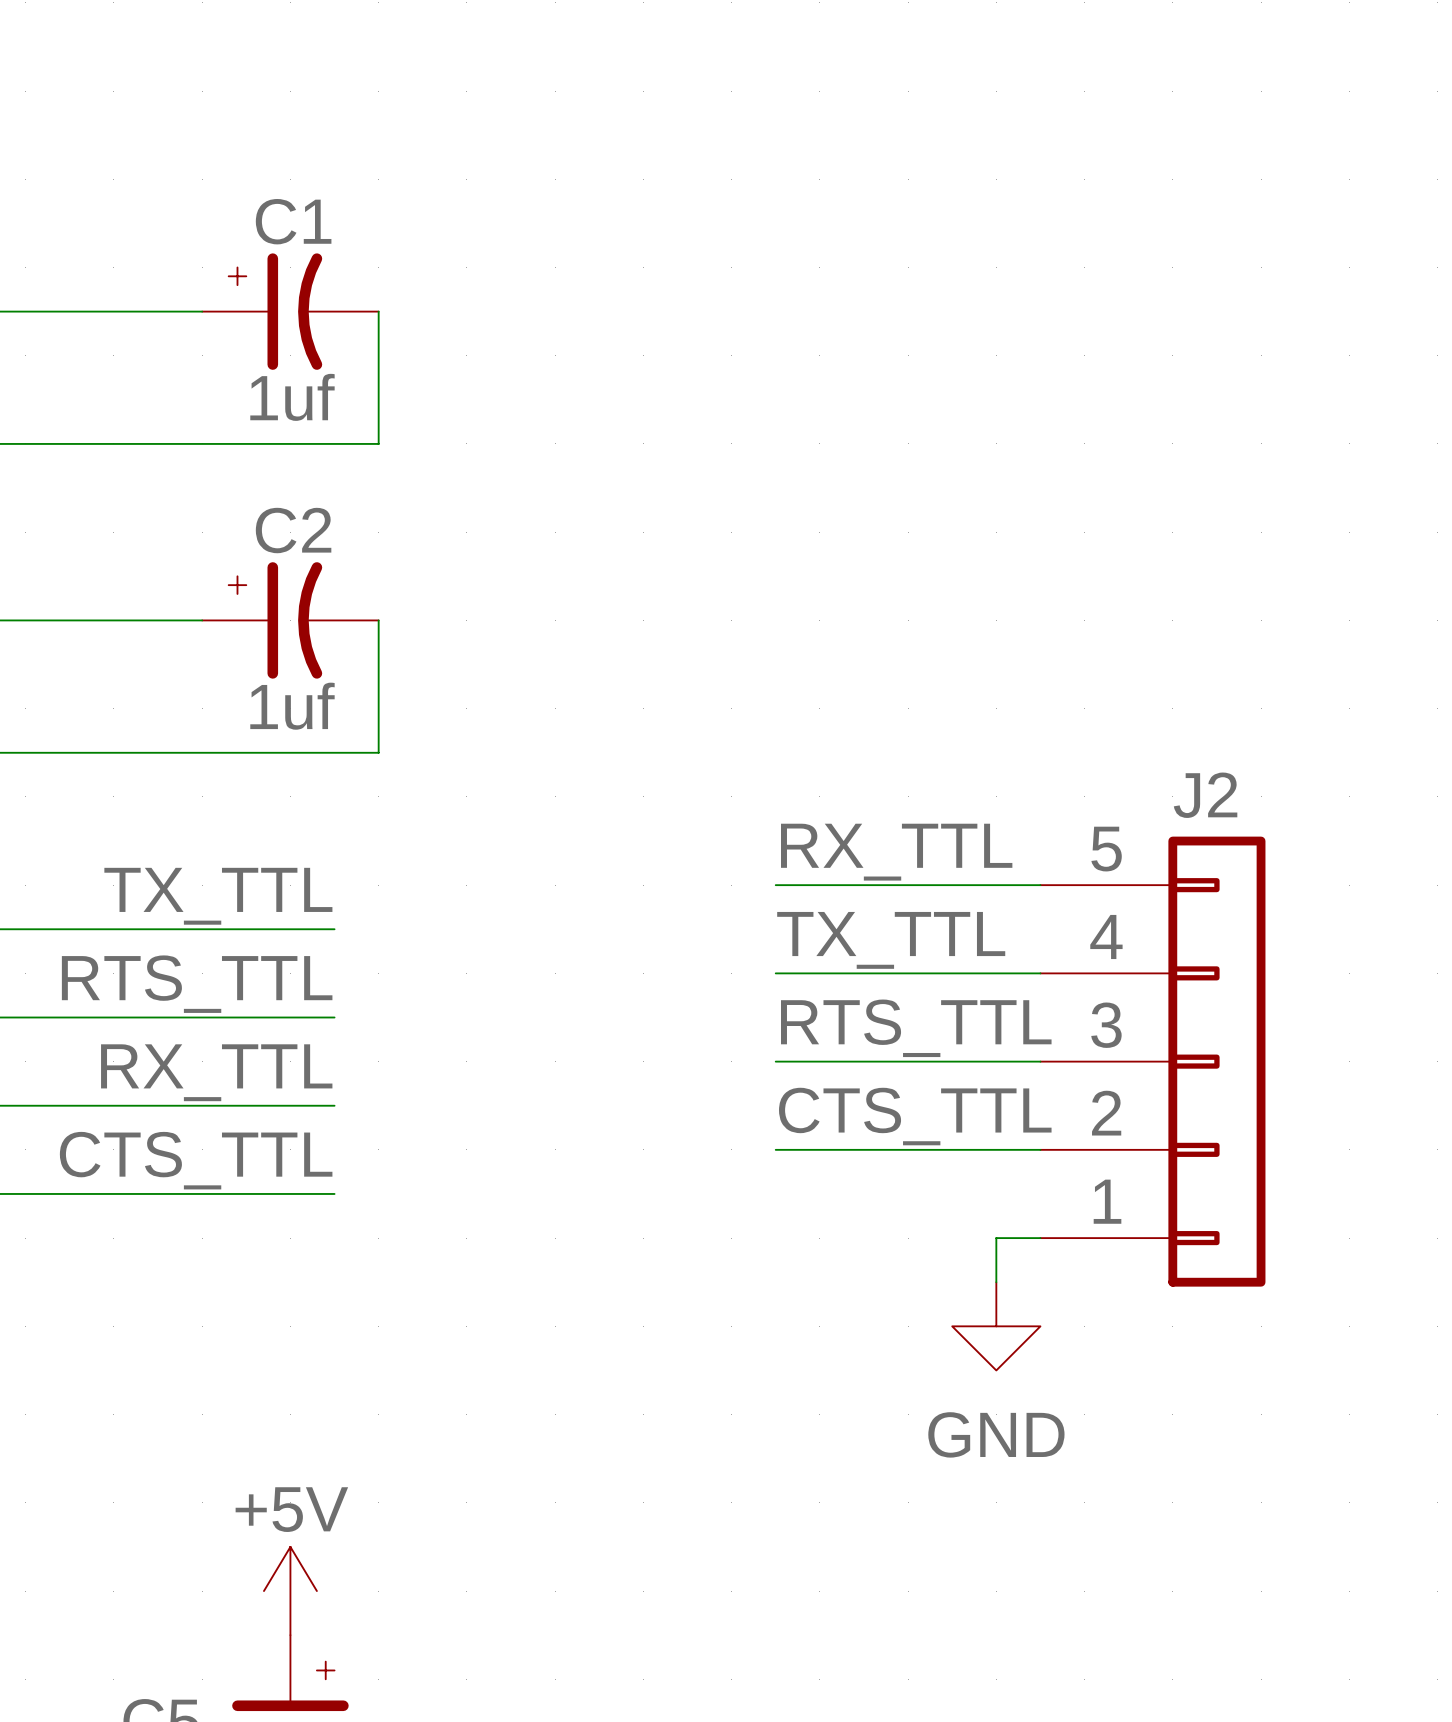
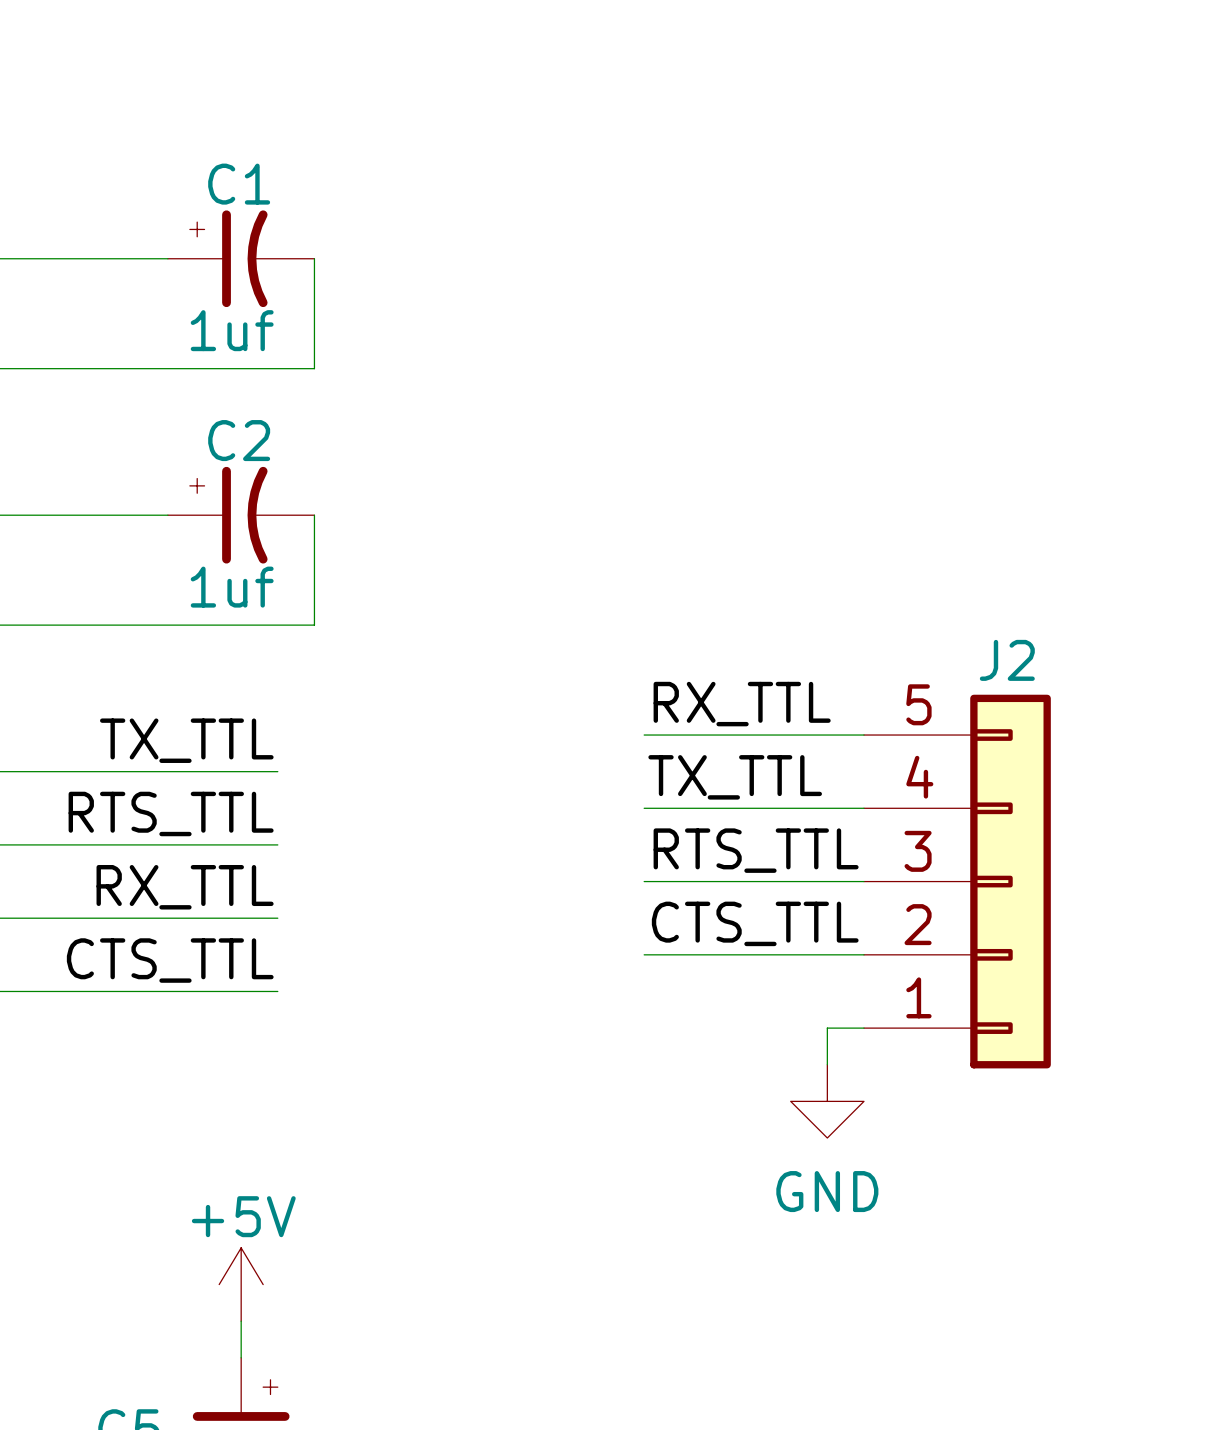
power symbol position: +5V (290, 1591) -> +5V (241, 1284)

